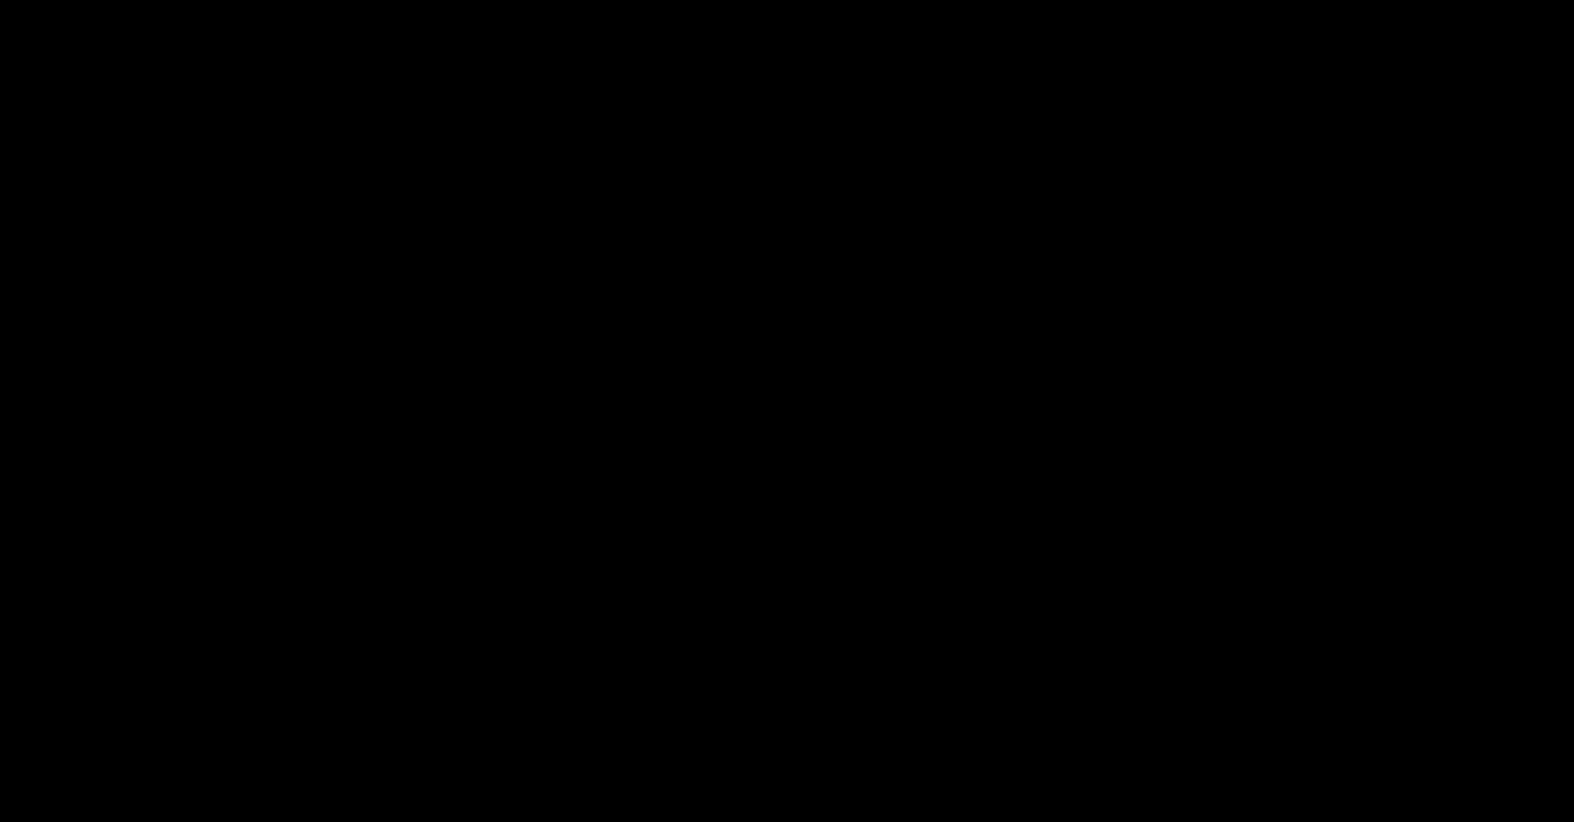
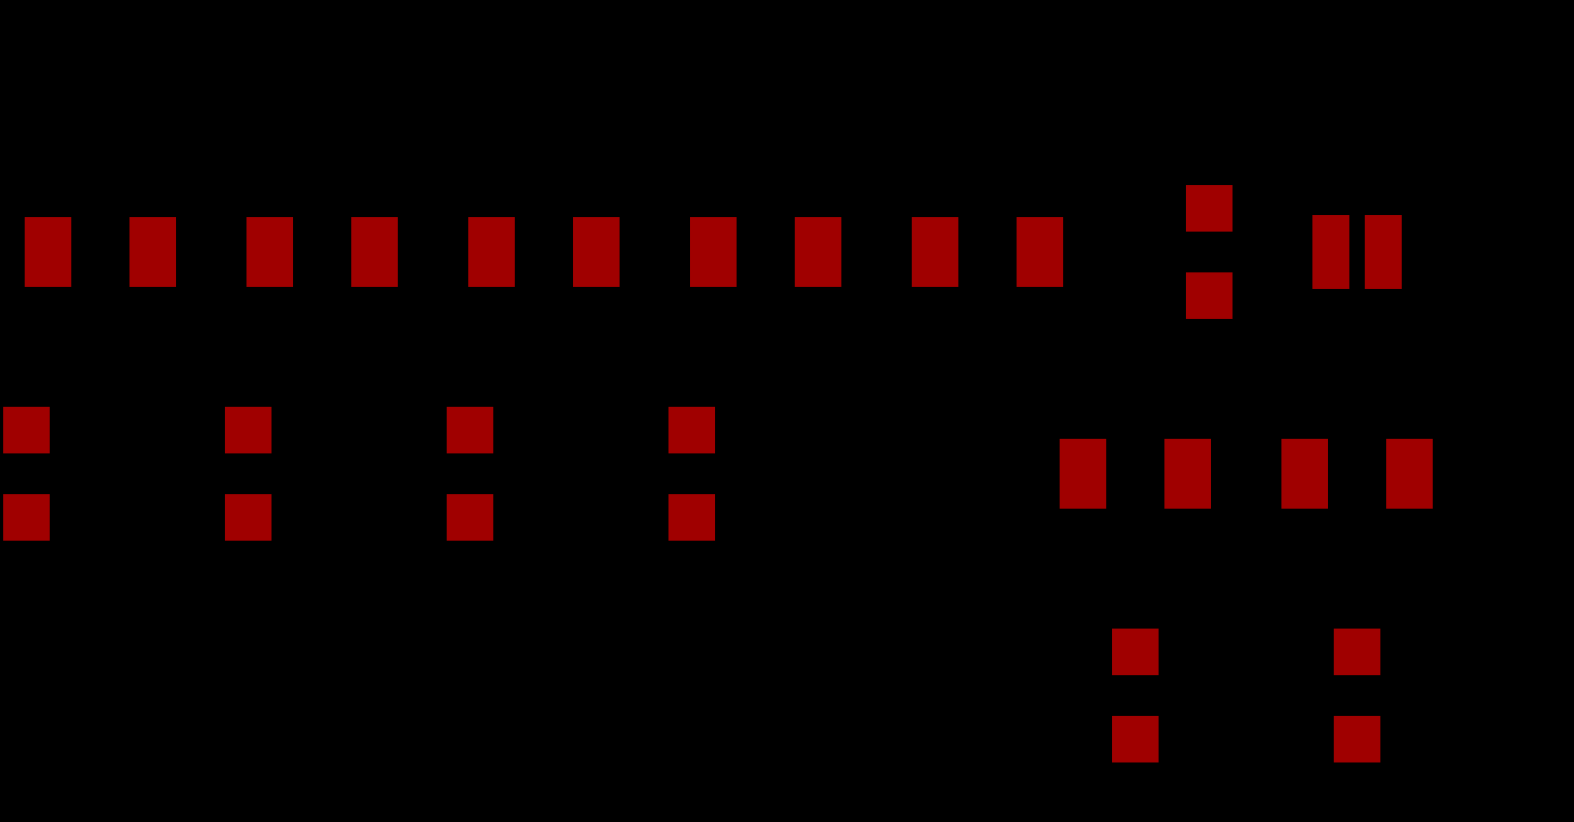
part: none -> (100, 251)
part: none -> (322, 251)
part: none -> (543, 251)
part: none -> (765, 251)
part: none -> (987, 251)
part: none -> (1209, 251)
part: none -> (1357, 251)
part: none -> (26, 473)
part: none -> (248, 473)
part: none -> (469, 473)
part: none -> (691, 473)
part: none -> (1135, 473)
part: none -> (1357, 473)
part: none -> (1135, 695)
part: none -> (1357, 695)

